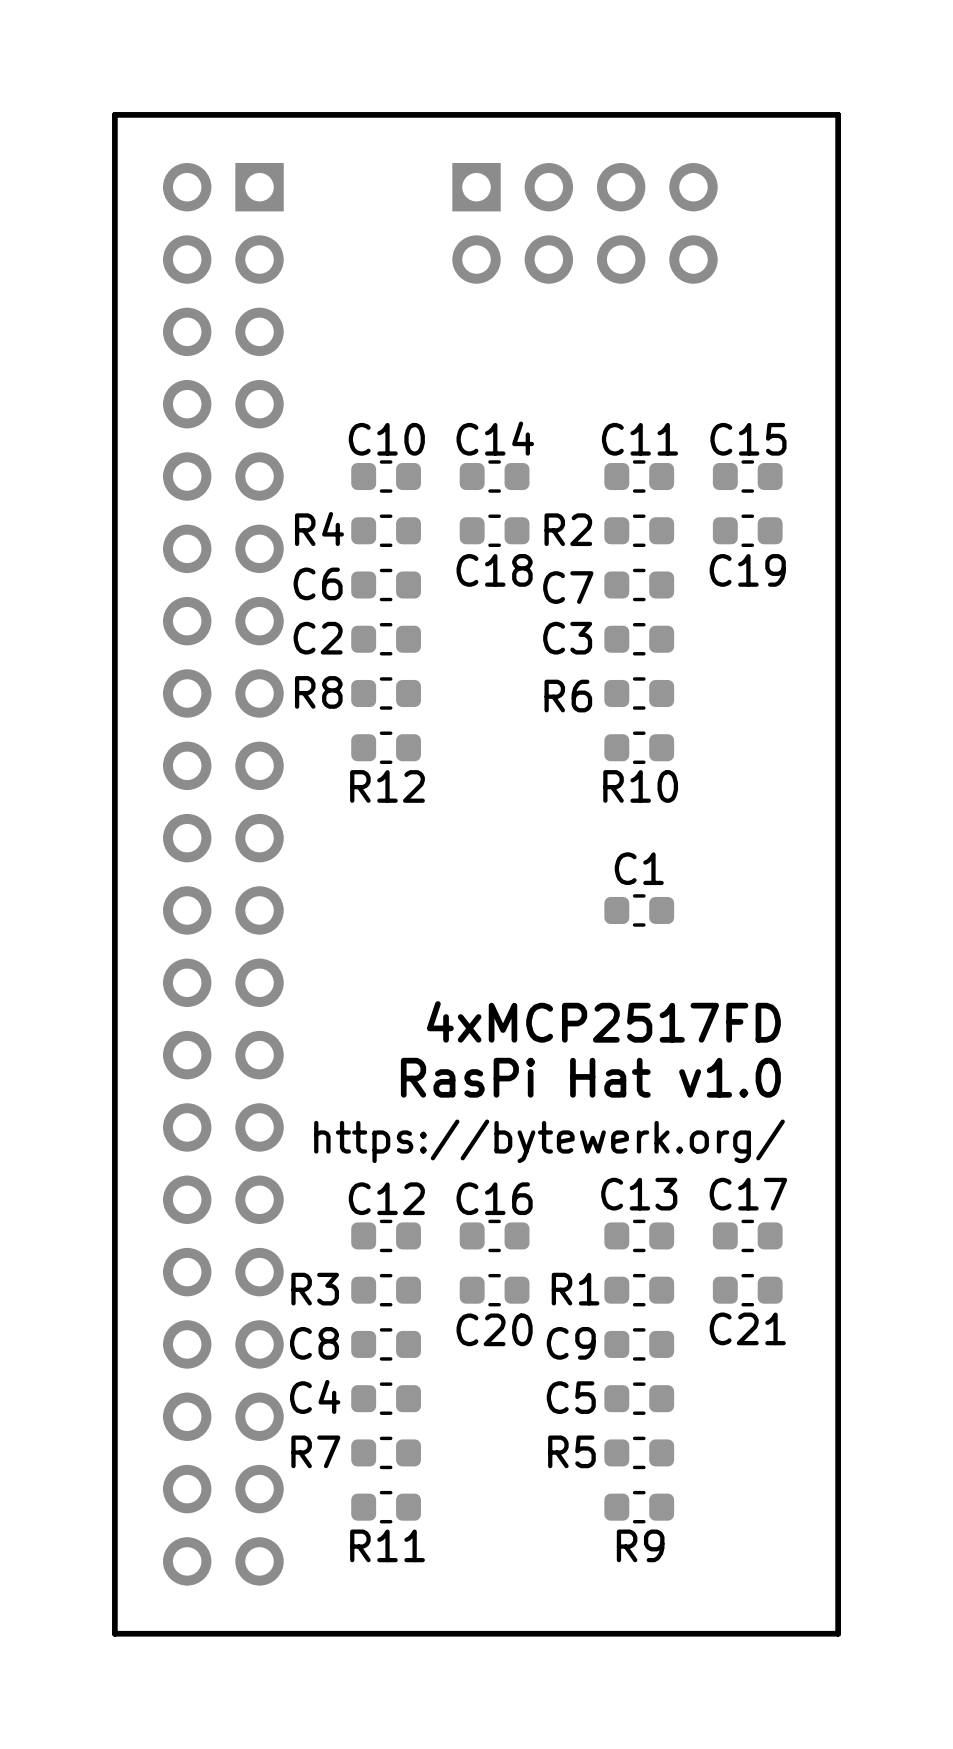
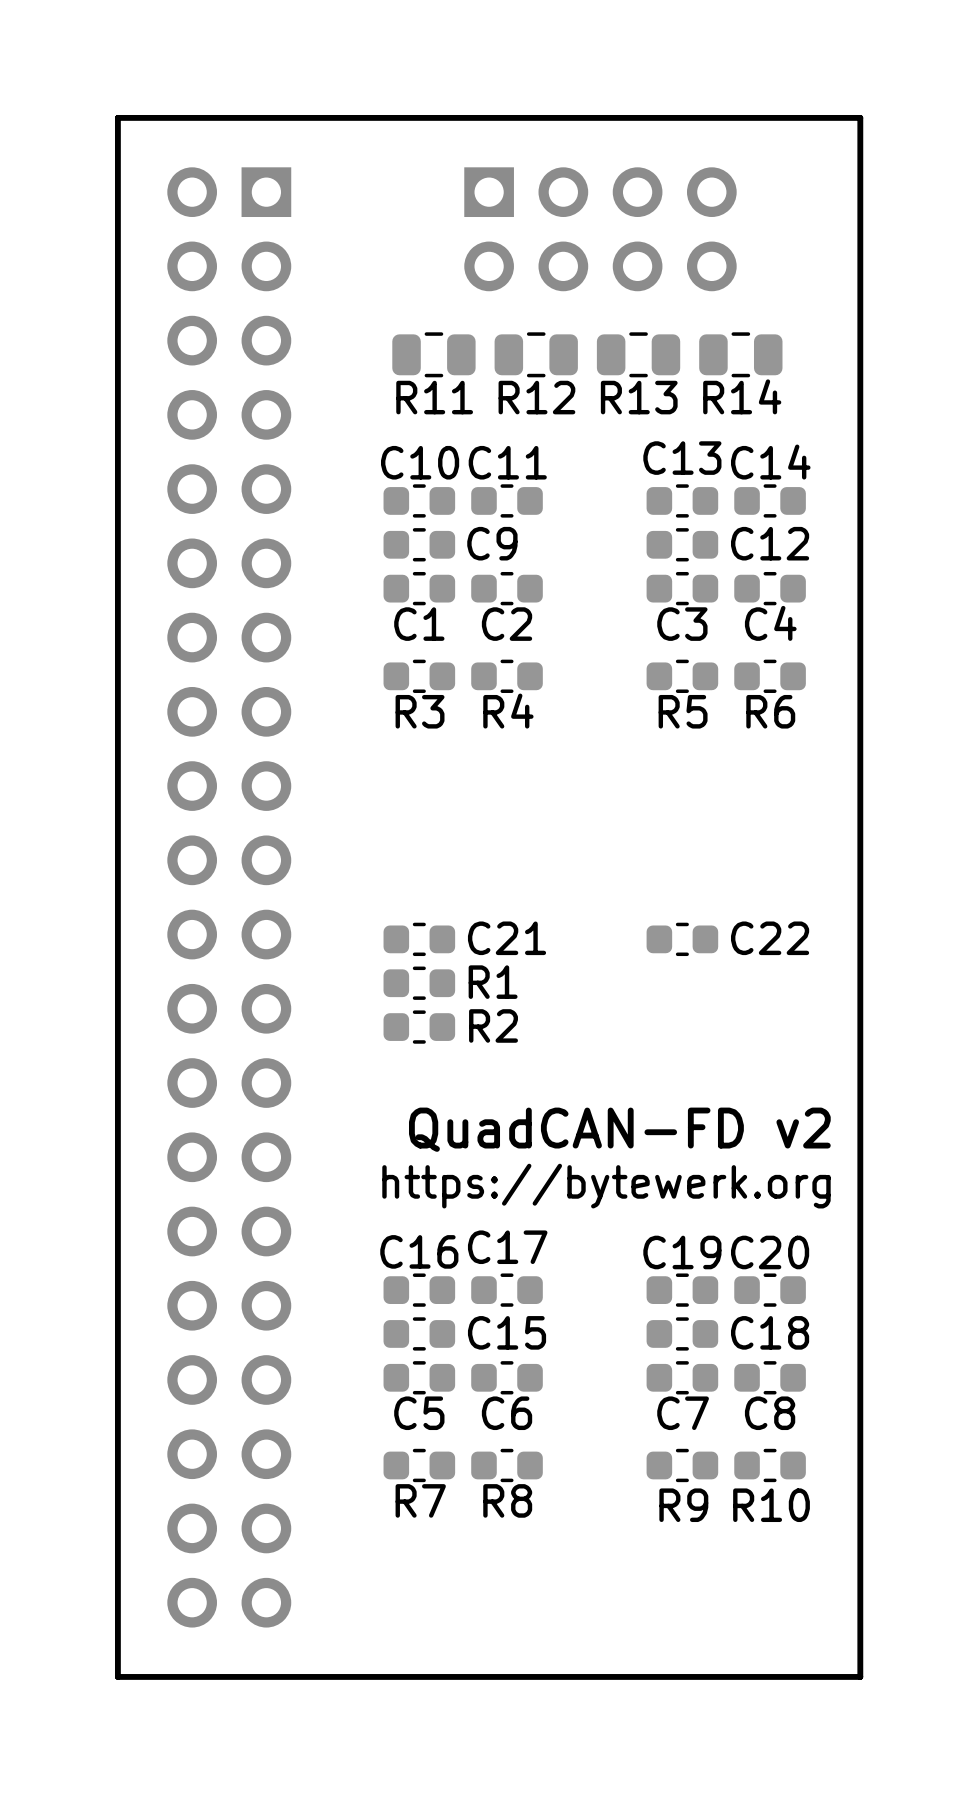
R13: none -> (638, 354)
R14: none -> (740, 354)
C15 name position: C15 (748, 439) -> C15 (507, 1332)
C10 position: (386, 476) -> (419, 500)
C14 position: (494, 476) -> (770, 500)
C11 position: (639, 476) -> (507, 500)
C15 position: (747, 476) -> (419, 1333)
R4 name position: R4 (319, 529) -> R4 (508, 711)
R2 name position: R2 (568, 529) -> R2 (493, 1025)
R4 position: (386, 530) -> (507, 676)
C18 position: (494, 530) -> (682, 1333)
R2 position: (639, 530) -> (419, 1027)
C19 position: (747, 530) -> (682, 1290)
C18 name position: C18 (494, 570) -> C18 (770, 1332)
C19 name position: C19 (747, 570) -> C19 (682, 1252)
C6 name position: C6 (318, 583) -> C6 (507, 1413)
C6 position: (386, 585) -> (507, 1377)
C7 position: (639, 585) -> (682, 1377)
C7 name position: C7 (568, 587) -> C7 (683, 1413)
C2 name position: C2 (318, 638) -> C2 (507, 624)
C3 name position: C3 (567, 638) -> C3 (682, 624)
C2 position: (386, 639) -> (507, 588)
C3 position: (639, 639) -> (682, 588)
R8 name position: R8 (318, 692) -> R8 (507, 1500)
R8 position: (386, 693) -> (507, 1465)
R6 position: (639, 693) -> (770, 676)
R6 name position: R6 (568, 696) -> R6 (770, 711)
R12 footprint: [351, 731, 421, 764] -> [494, 332, 578, 378]
R10 position: (639, 747) -> (770, 1465)
C1 name position: C1 (639, 868) -> C1 (419, 624)
C1 position: (639, 910) -> (419, 588)
C22: none -> (682, 939)
text: 4xMCP2517FD (603, 1021) -> none
text: RasPi Hat v1.0 (590, 1077) -> none
text: none -> QuadCAN-FD v2 (619, 1129)
text: https://bytewerk.org/ (549, 1141) -> https://bytewerk.org (606, 1186)
C12 name position: C12 (386, 1198) -> C12 (770, 543)
C12 position: (386, 1235) -> (682, 544)
C16 position: (494, 1235) -> (419, 1290)
C13 position: (639, 1235) -> (682, 500)
C17 position: (747, 1235) -> (507, 1290)
R3 name position: R3 (315, 1289) -> R3 (420, 711)
R1 name position: R1 (575, 1289) -> R1 (493, 982)
R3 position: (386, 1290) -> (419, 676)
C20 position: (494, 1290) -> (770, 1290)
R1 position: (639, 1290) -> (419, 983)
C21 position: (747, 1290) -> (419, 939)
C21 name position: C21 (747, 1328) -> C21 (507, 938)
C20 name position: C20 (494, 1329) -> C20 (770, 1252)
C8 name position: C8 (314, 1343) -> C8 (770, 1413)
C9 name position: C9 (571, 1343) -> C9 (492, 543)
C8 position: (386, 1344) -> (770, 1377)
C9 position: (639, 1344) -> (419, 544)
C4 name position: C4 (315, 1396) -> C4 (770, 623)
C5 name position: C5 (571, 1397) -> C5 (419, 1413)
C4 position: (386, 1398) -> (770, 588)
C5 position: (639, 1398) -> (419, 1377)
R7 name position: R7 (315, 1451) -> R7 (420, 1500)
R5 name position: R5 (571, 1451) -> R5 (683, 711)
R7 position: (386, 1452) -> (419, 1465)
R5 position: (639, 1452) -> (682, 676)
R11 footprint: [351, 1490, 421, 1524] -> [392, 332, 476, 378]
R9 position: (639, 1507) -> (682, 1465)

